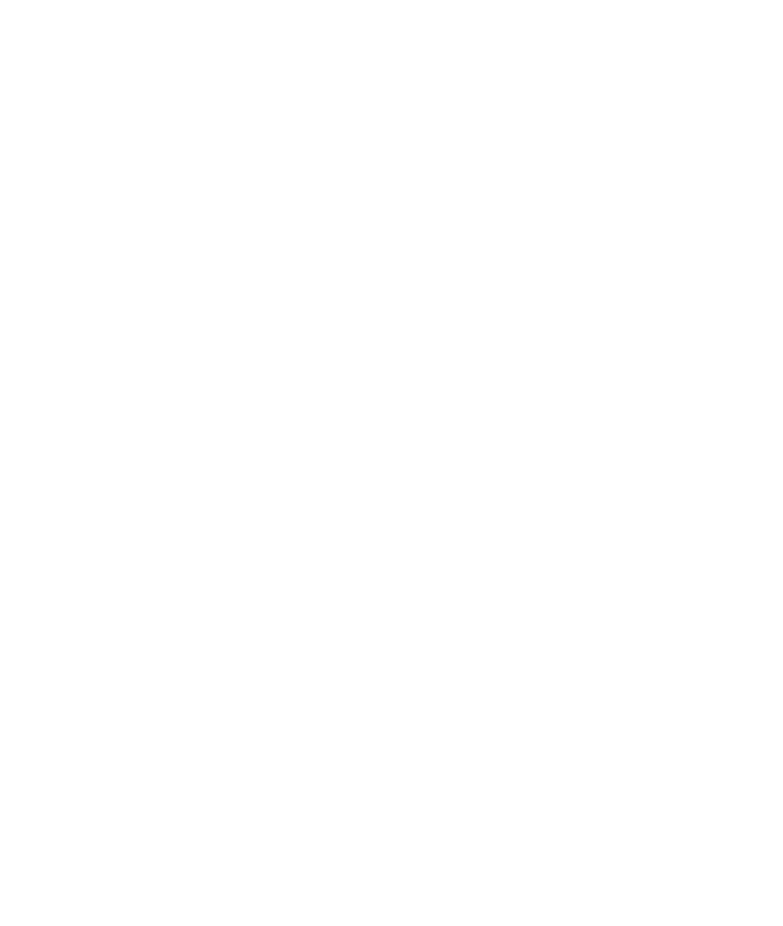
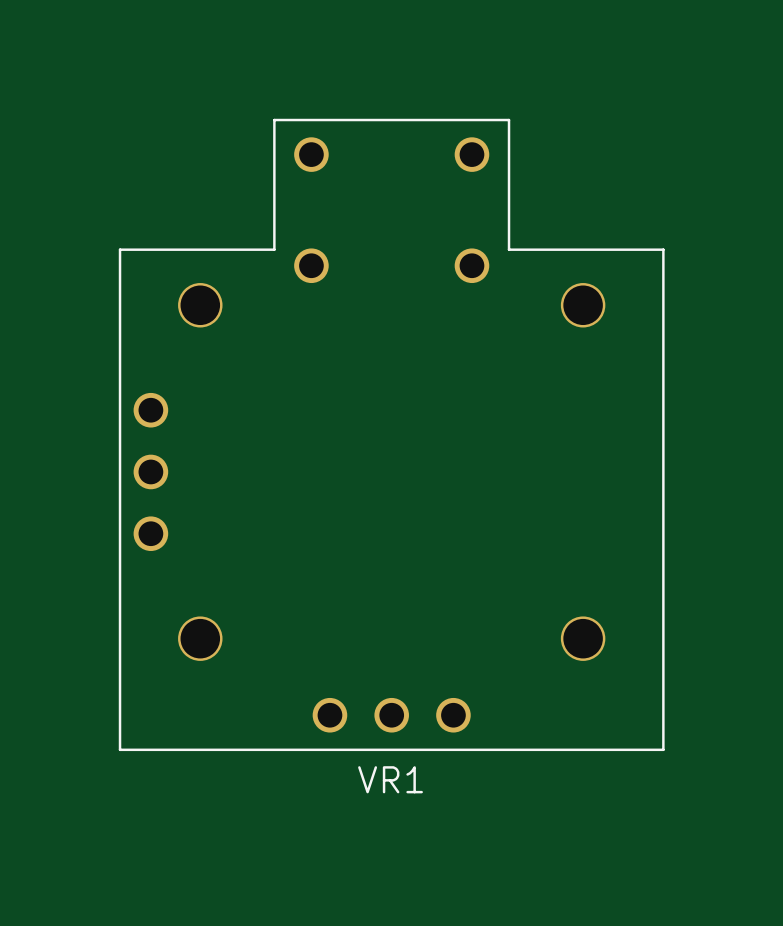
VR1: none -> (391, 434)

